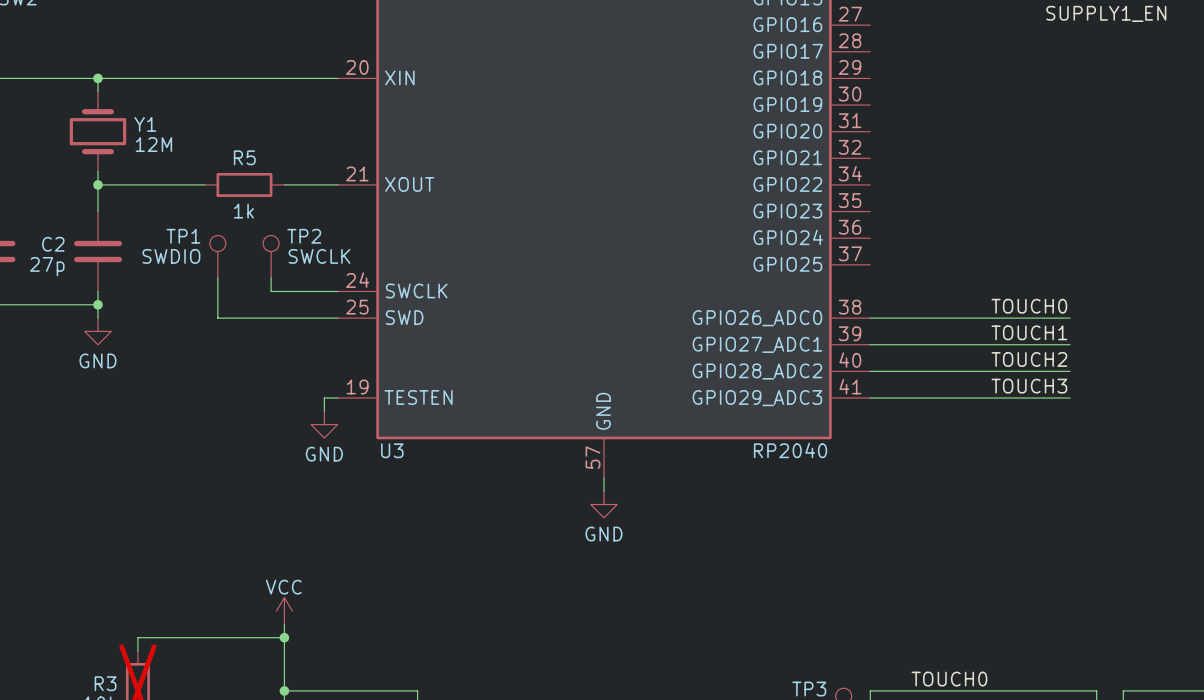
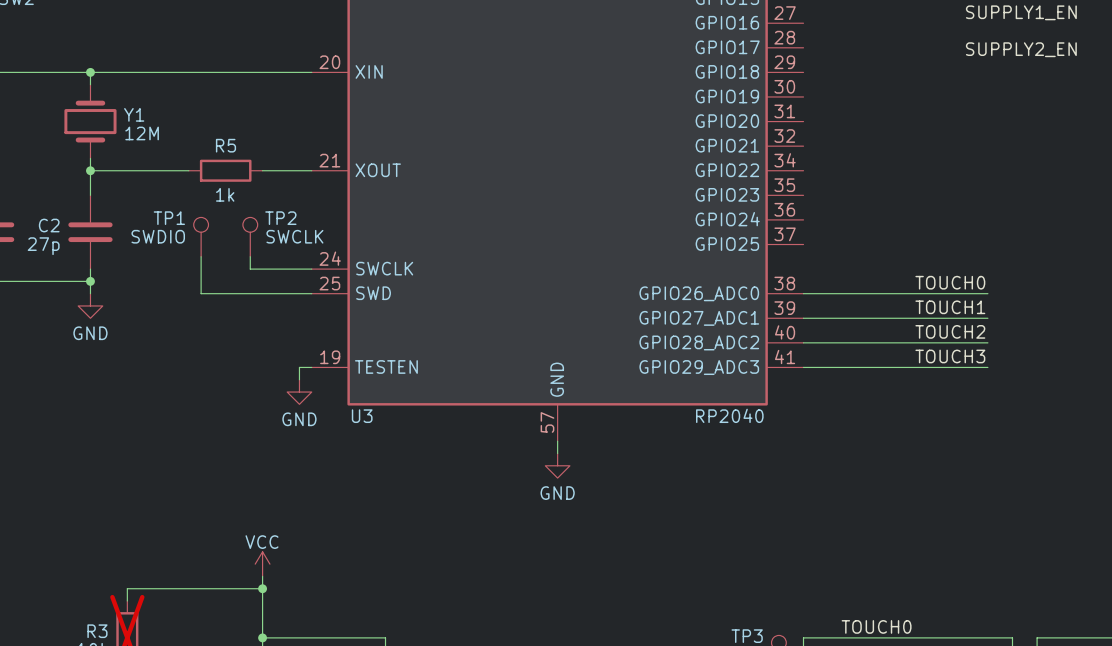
label: none -> SUPPLY2_EN (1021, 49)

